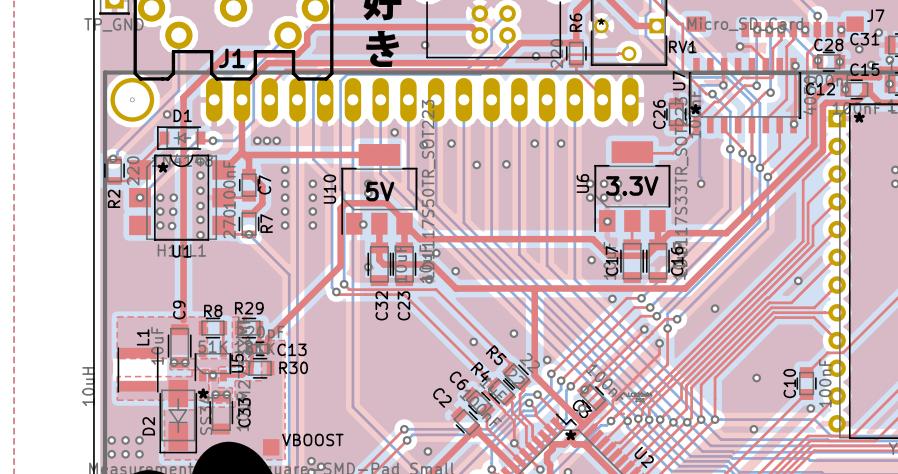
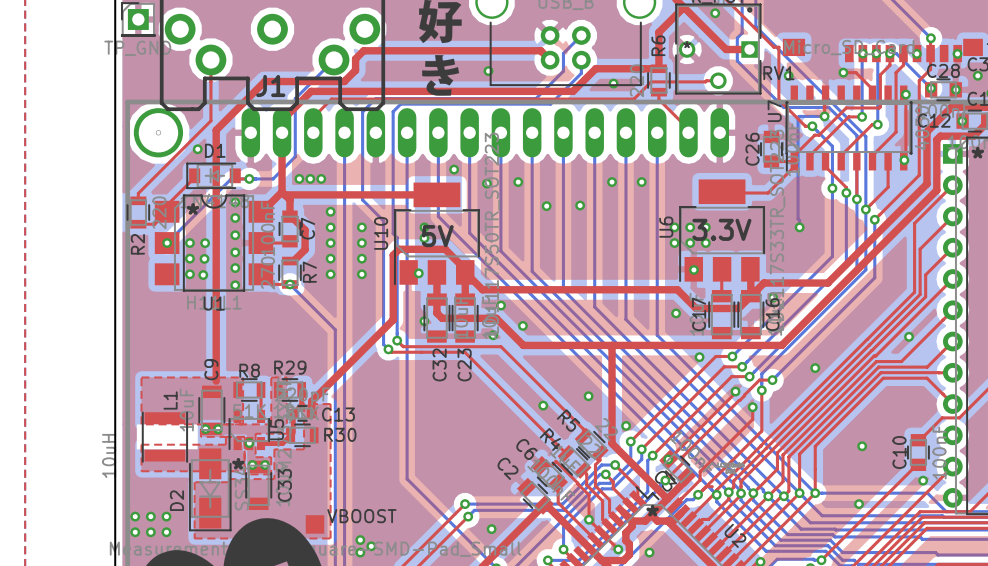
top track: none -> (210, 59) (210, 120) (138, 193) (138, 200)
bottom track: (178, 35) (178, 90) (113, 158) -> none
text: * (695, 109) -> none
via: (113, 158) -> none

